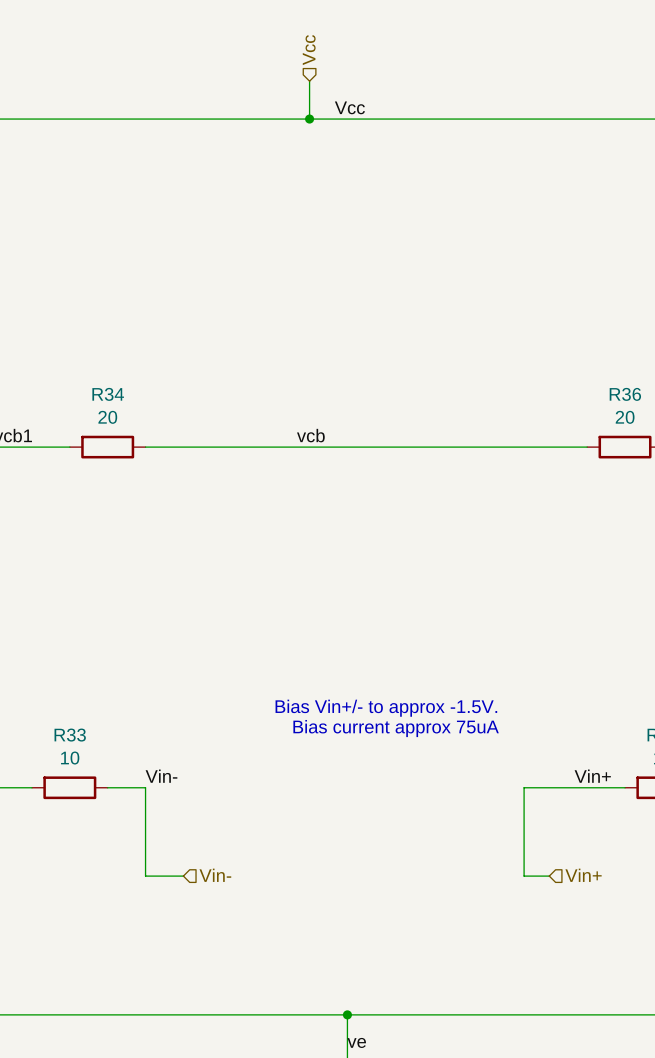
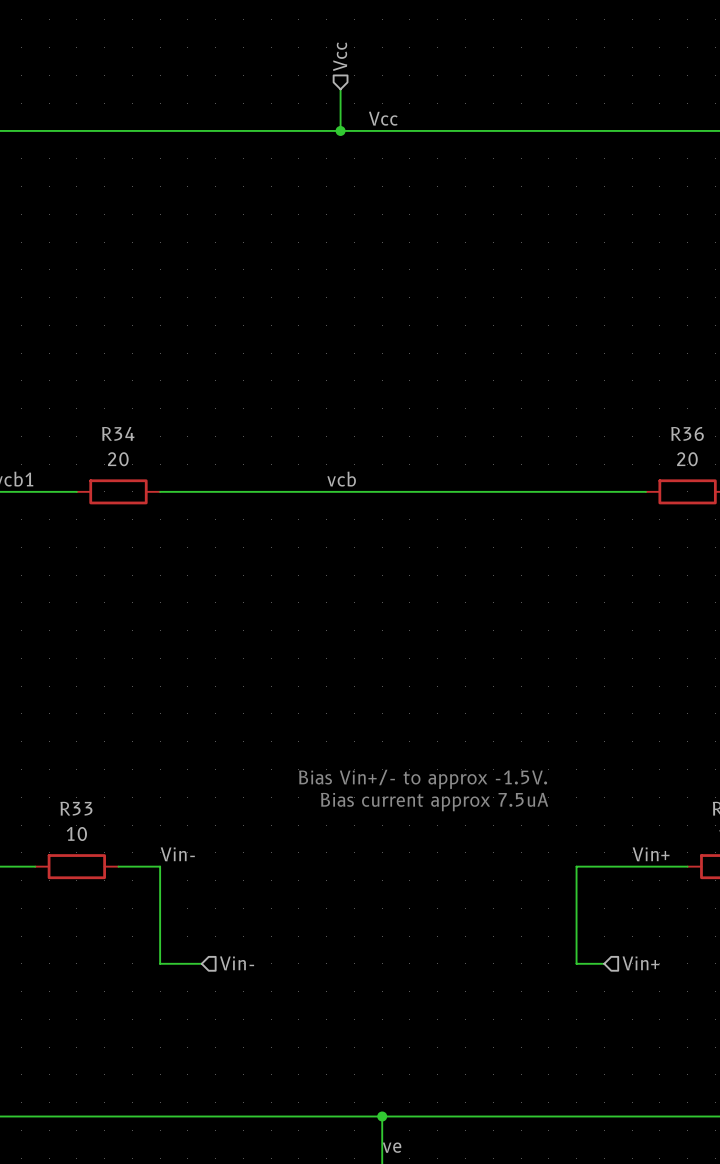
text: Bias current approx 75uA (396, 728) -> Bias current approx 7.5uA (434, 802)

